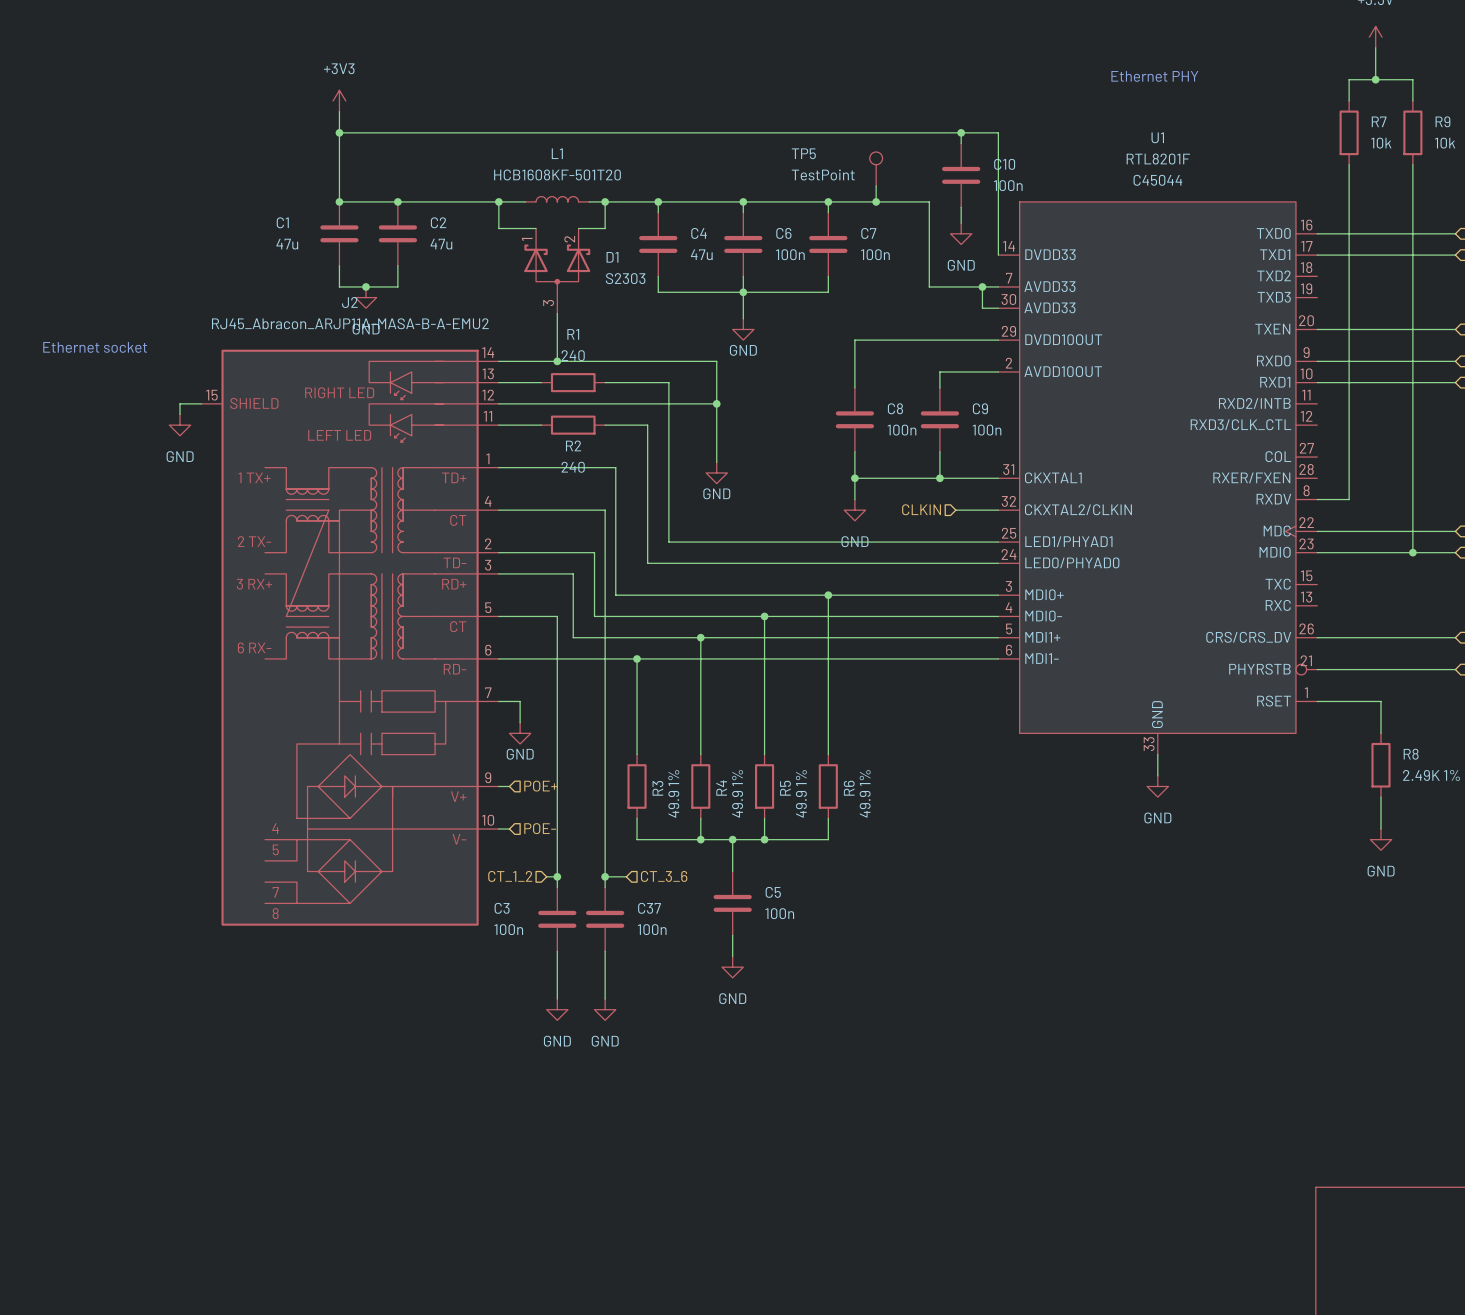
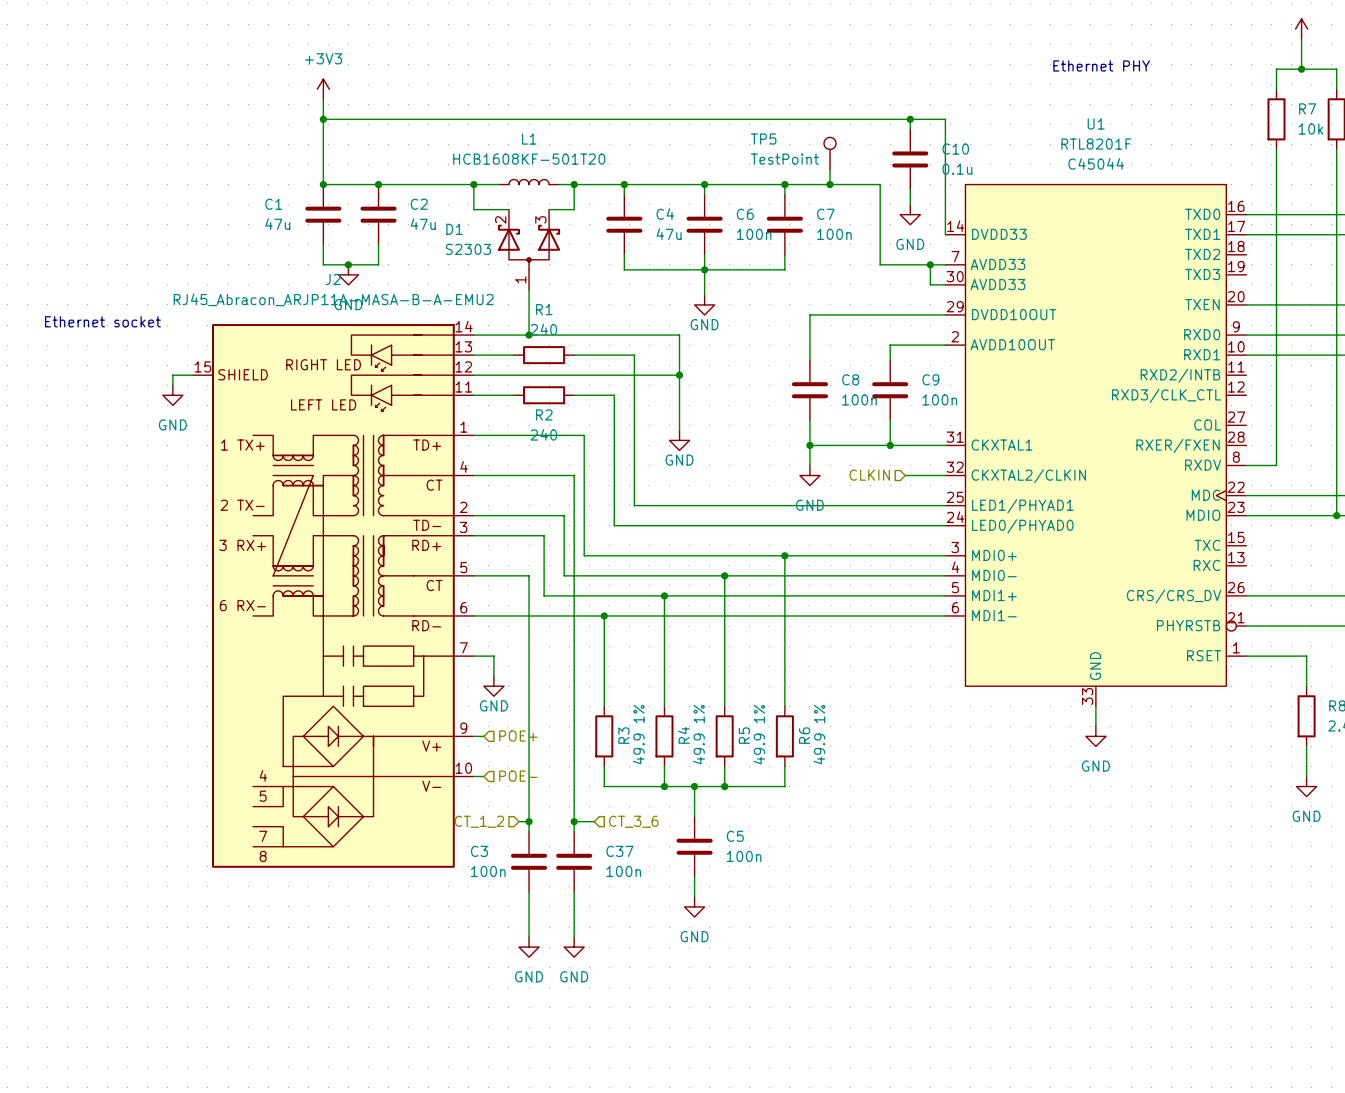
C10 value: 100n (1008, 185) -> 0.1u (957, 169)
D1 pin number: 1 (527, 239) -> 2 (500, 219)
D1 pin number: 2 (569, 239) -> 3 (540, 219)
D1 name position: D1 (612, 257) -> D1 (454, 229)
D1 value position: S2303 (625, 278) -> S2303 (468, 249)
D1 pin number: 3 (548, 303) -> 1 (520, 279)

